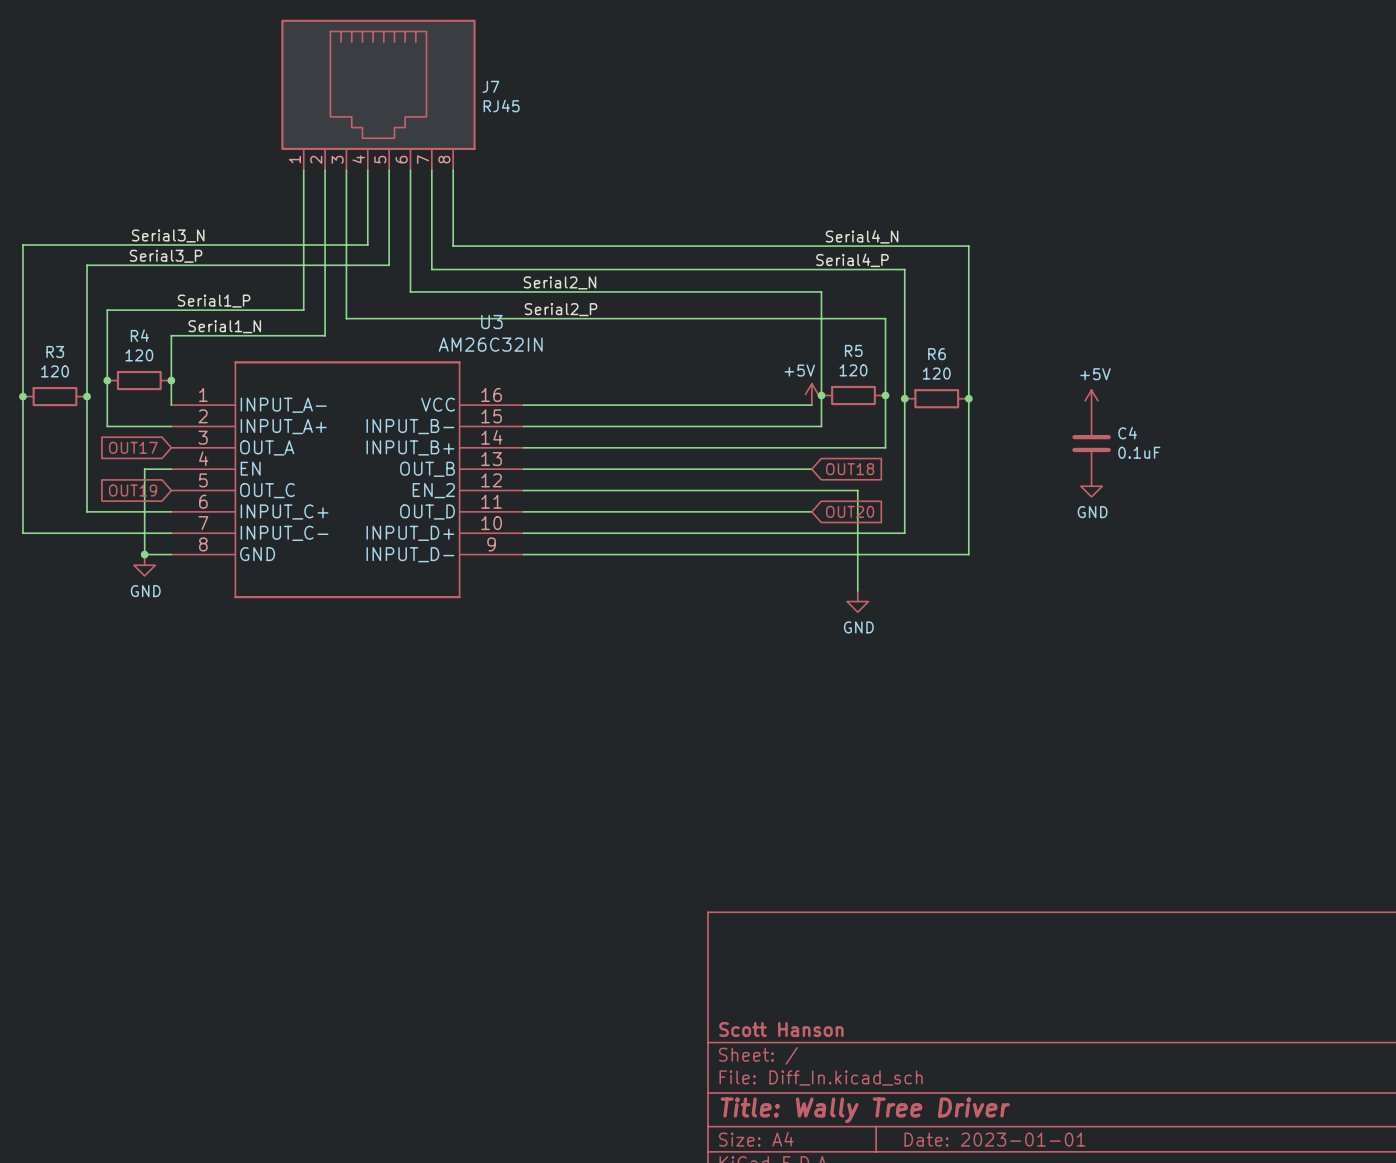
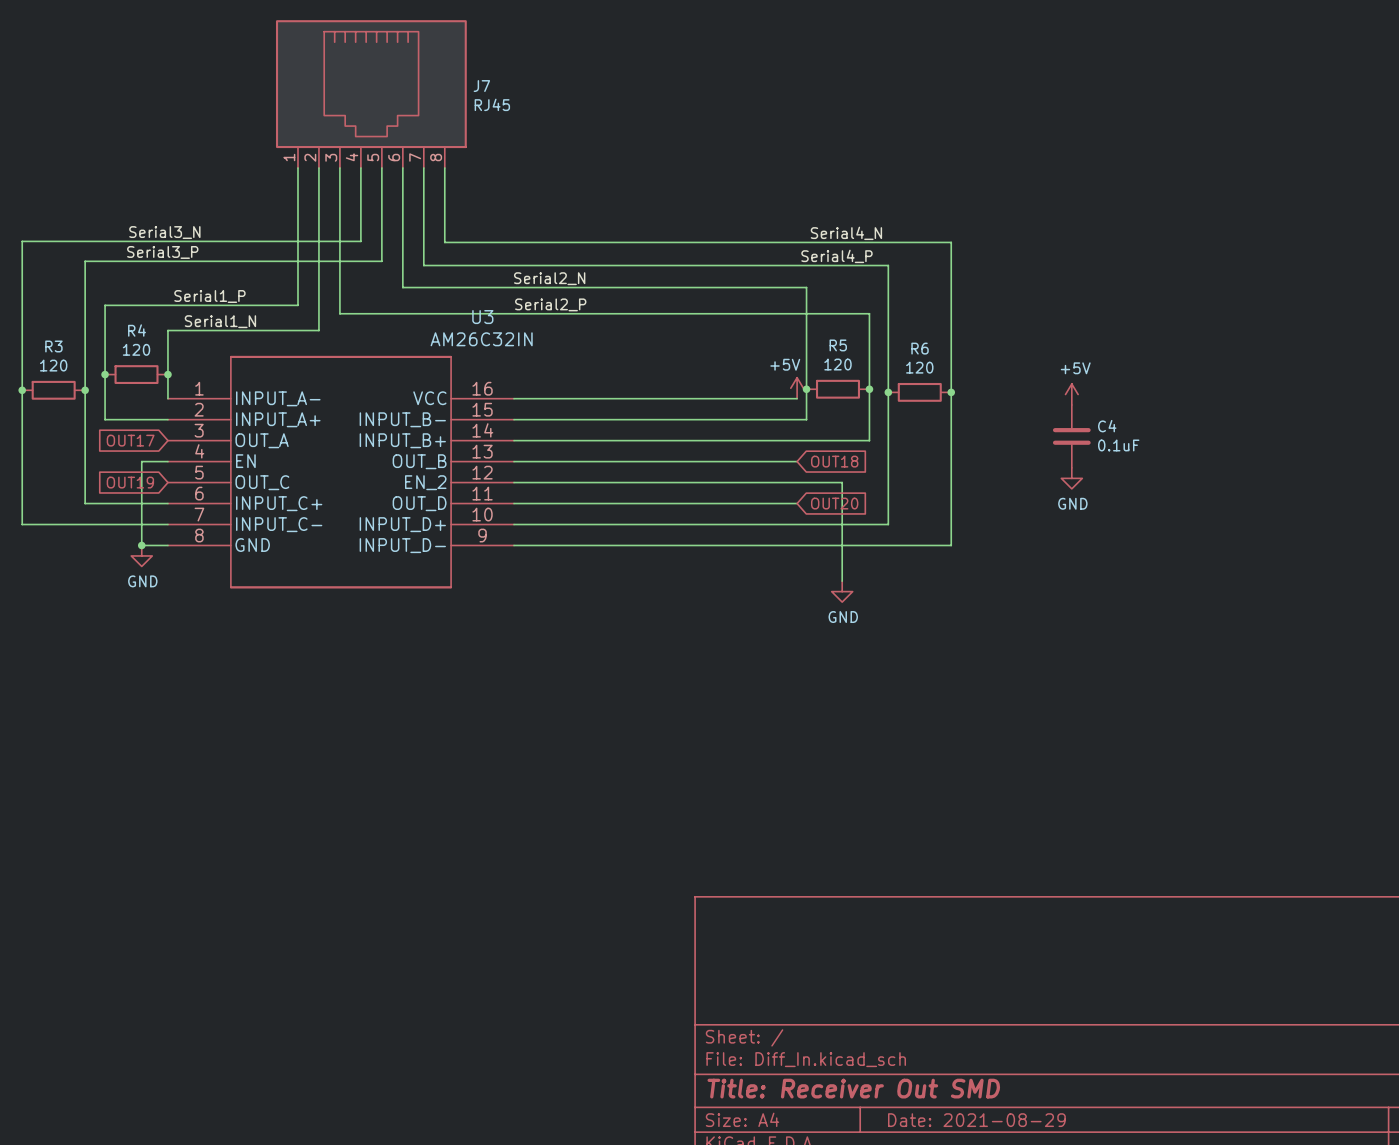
title block: Scott Hanson (781, 1029) -> none
title block: Title: Wally Tree Driver (865, 1110) -> Title: Receiver Out SMD (853, 1088)
title block: Date: 2023-01-01 (994, 1139) -> Date: 2021-08-29 (976, 1120)

